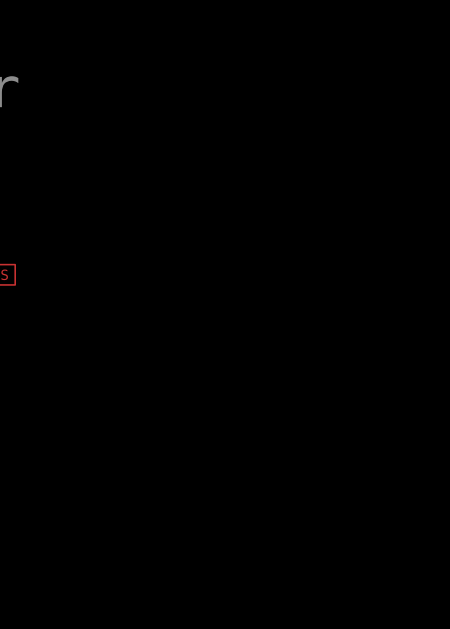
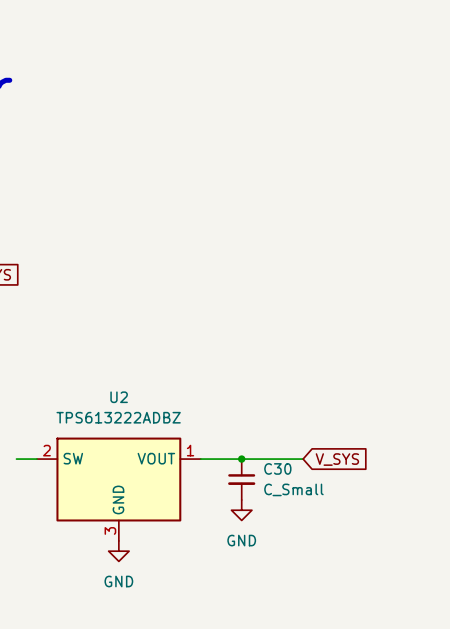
wire: none -> (16, 459) (36, 459)
wire: none -> (200, 459) (303, 459)
junction: none -> (241, 459)
global label: none -> V_SYS (337, 459)
C30: none -> C_Small (241, 479)
U2: none -> TPS613222ADBZ (118, 489)
power symbol: none -> GND (241, 510)
power symbol: none -> GND (118, 551)

